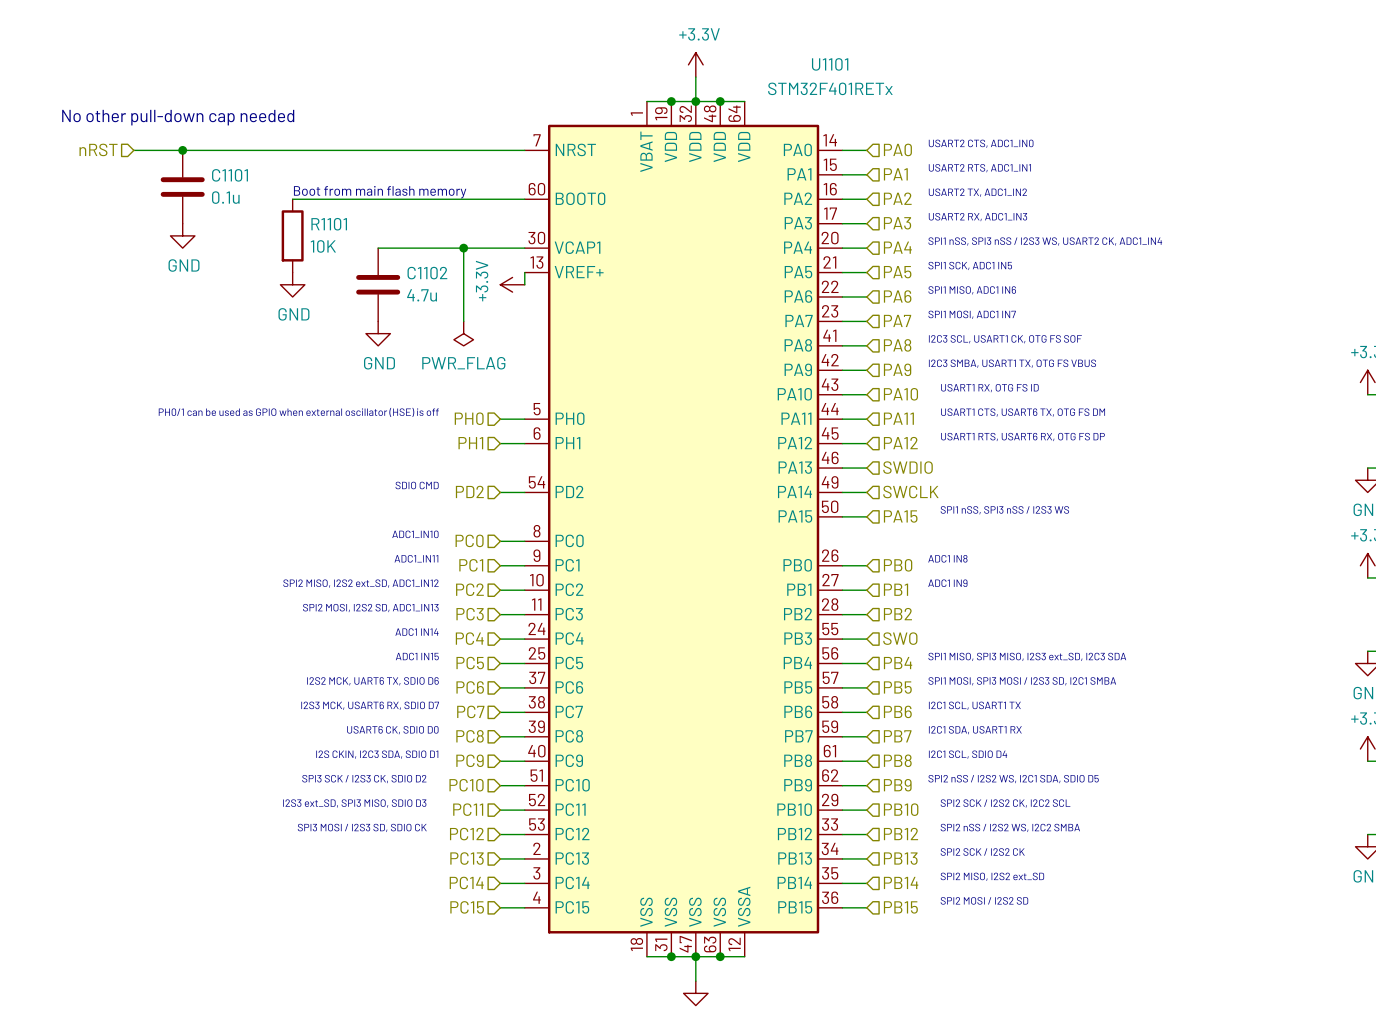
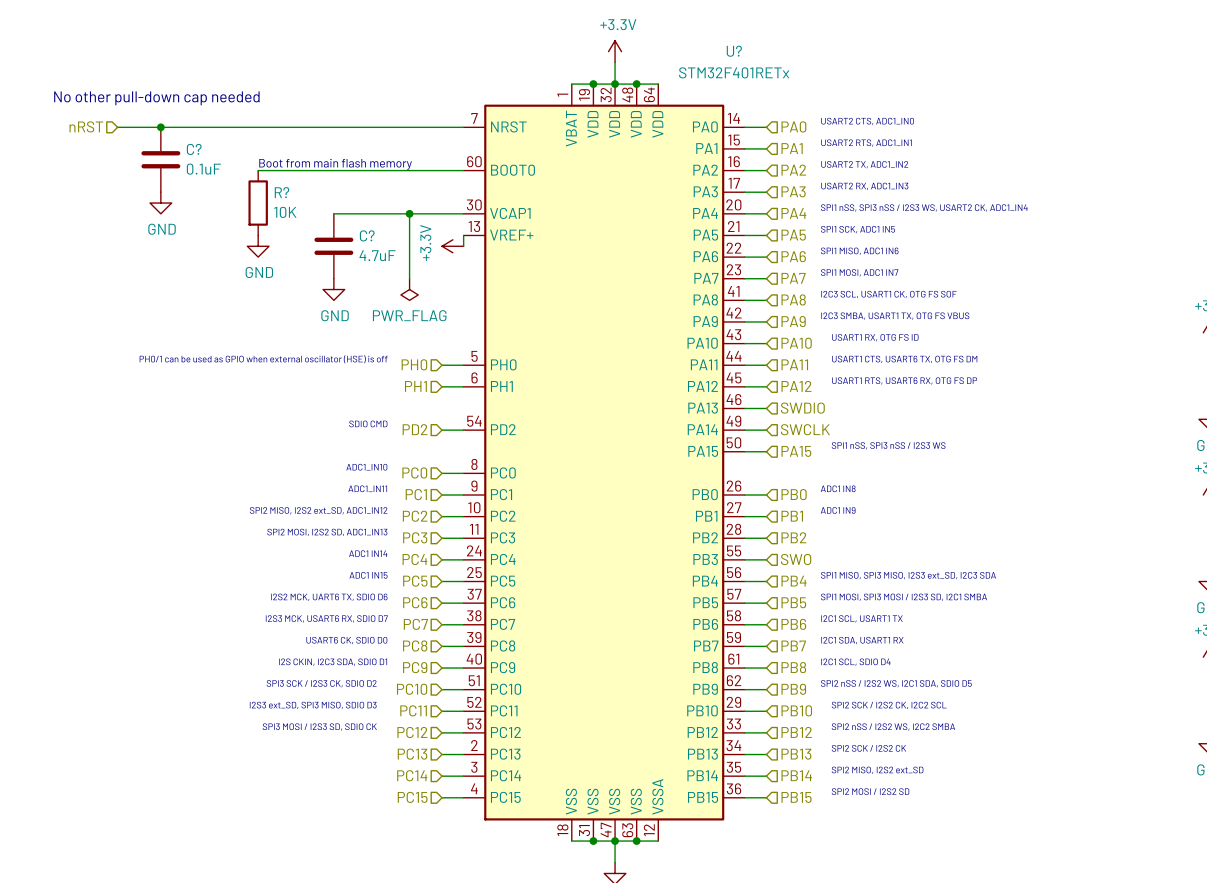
U1101 name: U1101 (830, 64) -> U? (734, 51)
C1101 name: C1101 (230, 175) -> C? (194, 149)
C1101 value: 0.1u (225, 197) -> 0.1uF (203, 169)
R1101 name: R1101 (329, 224) -> R? (282, 192)
C1102 name: C1102 (427, 273) -> C? (367, 235)
C1102 value: 4.7u (422, 295) -> 4.7uF (377, 255)

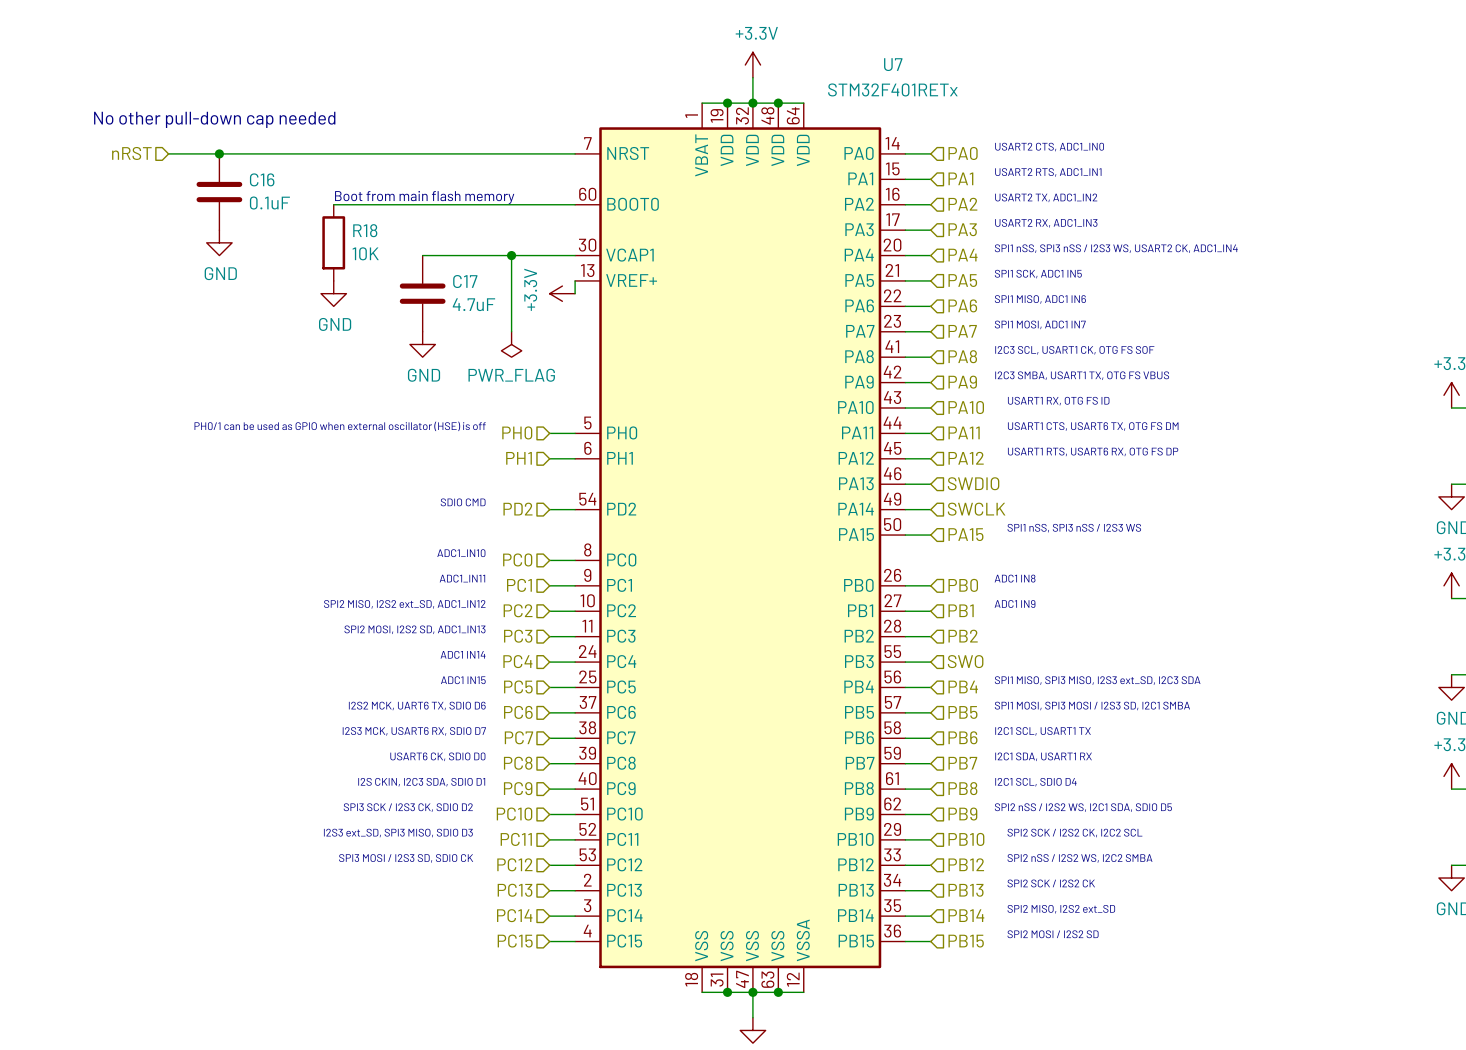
U? name: U? (734, 51) -> U7 (893, 64)
C? name: C? (194, 149) -> C16 (262, 179)
R? name: R? (282, 192) -> R18 (365, 230)
C? name: C? (367, 235) -> C17 (465, 281)

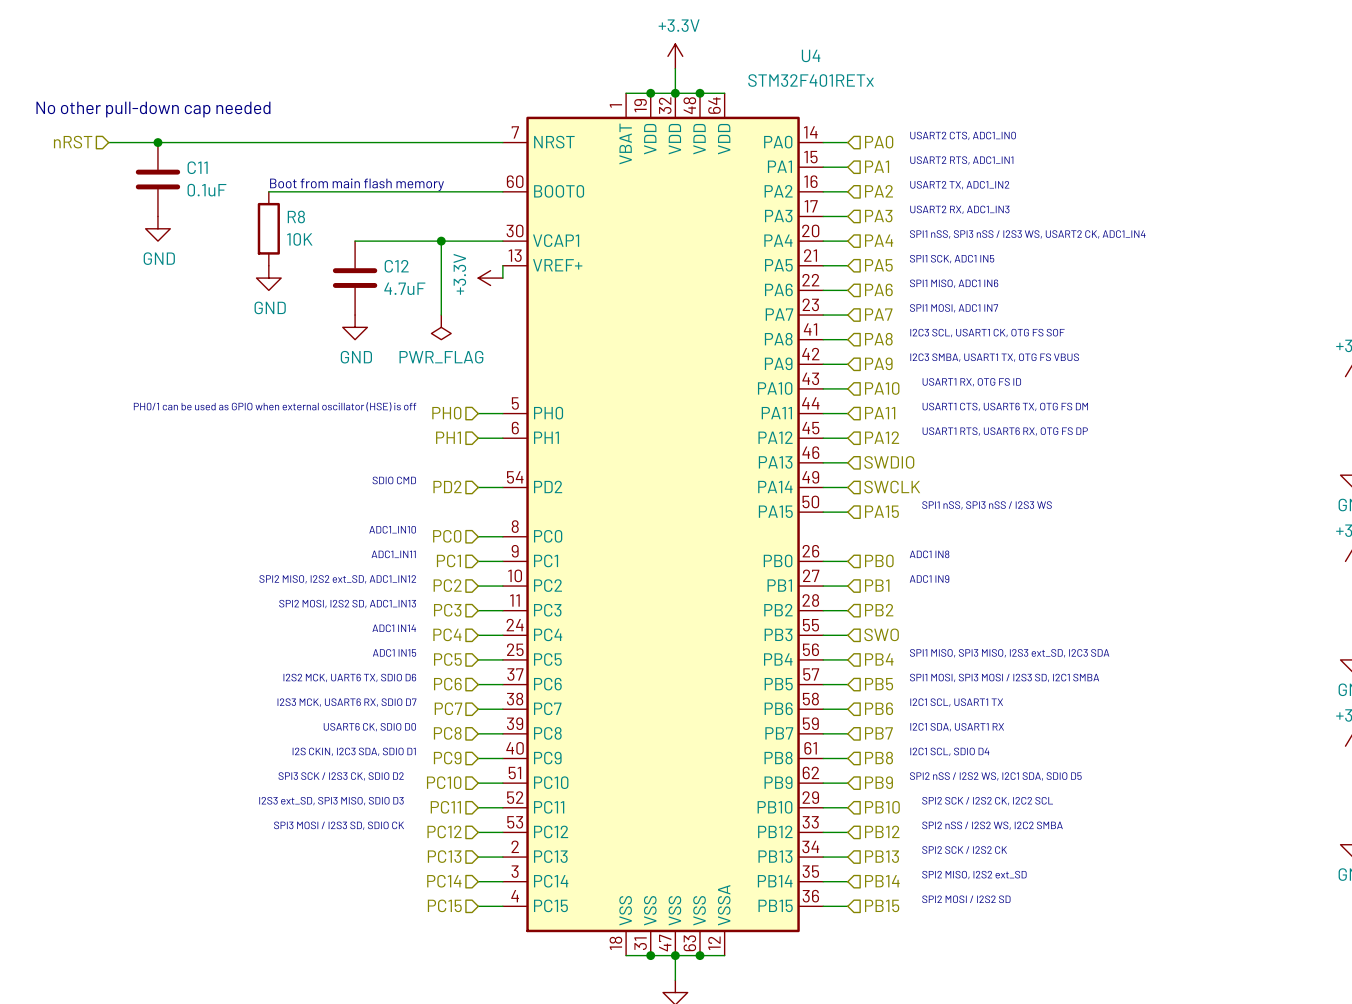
U7 name: U7 (893, 64) -> U4 (811, 55)
C16 name: C16 (262, 179) -> C11 (197, 167)
R18 name: R18 (365, 230) -> R8 (296, 216)
C17 name: C17 (465, 281) -> C12 (396, 266)

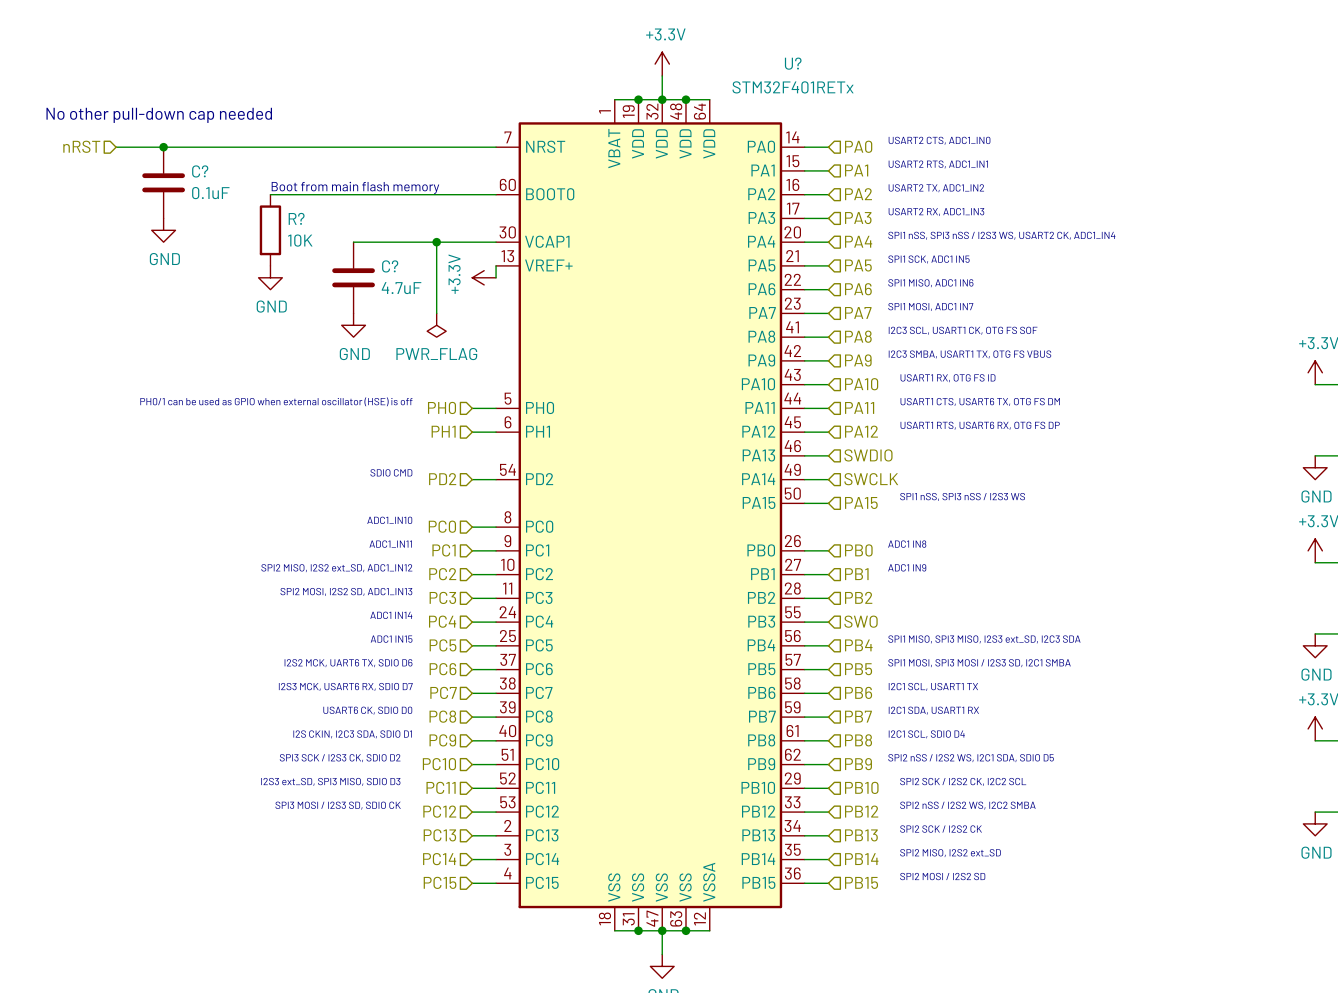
U4 name: U4 (811, 55) -> U? (793, 63)
C11 name: C11 (197, 167) -> C? (200, 171)
R8 name: R8 (296, 216) -> R? (296, 218)
C12 name: C12 (396, 266) -> C? (390, 266)

